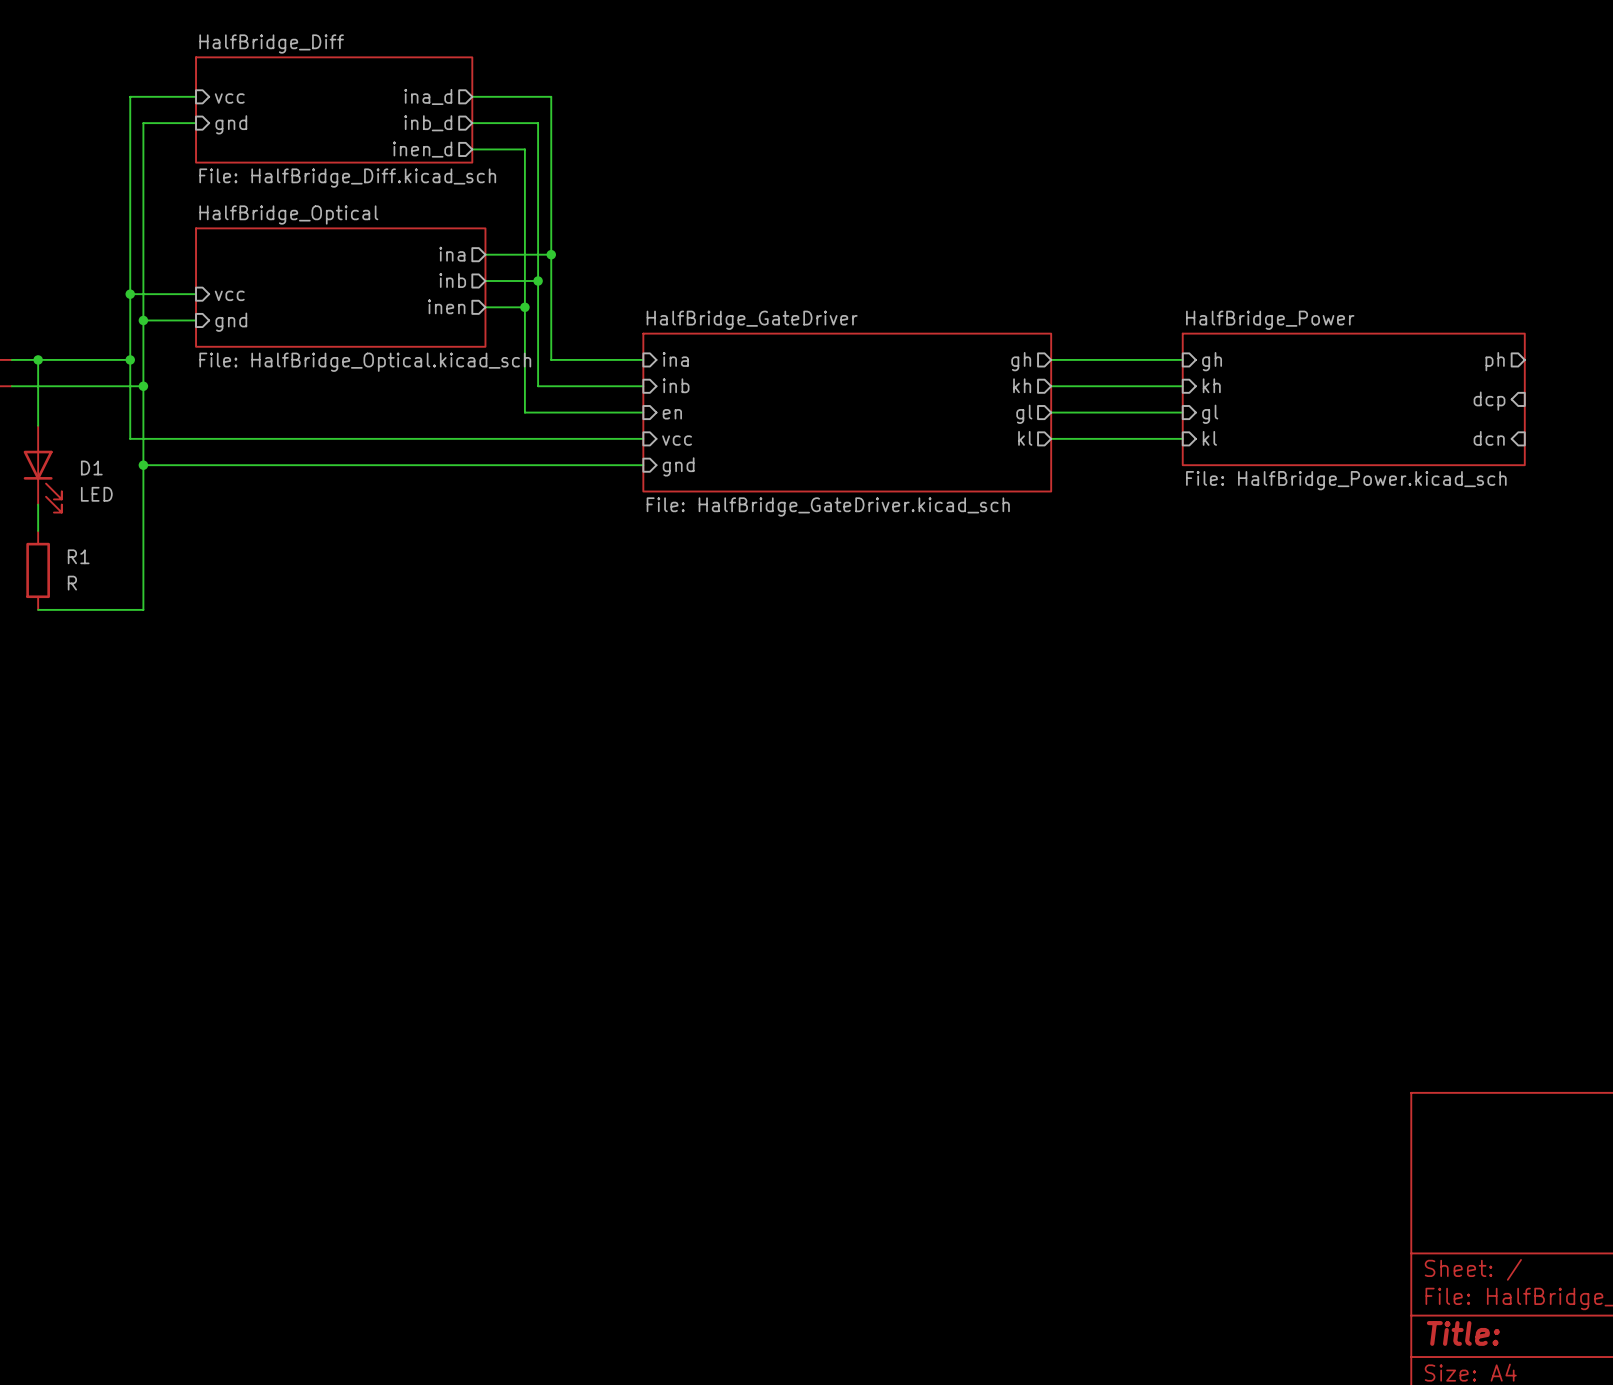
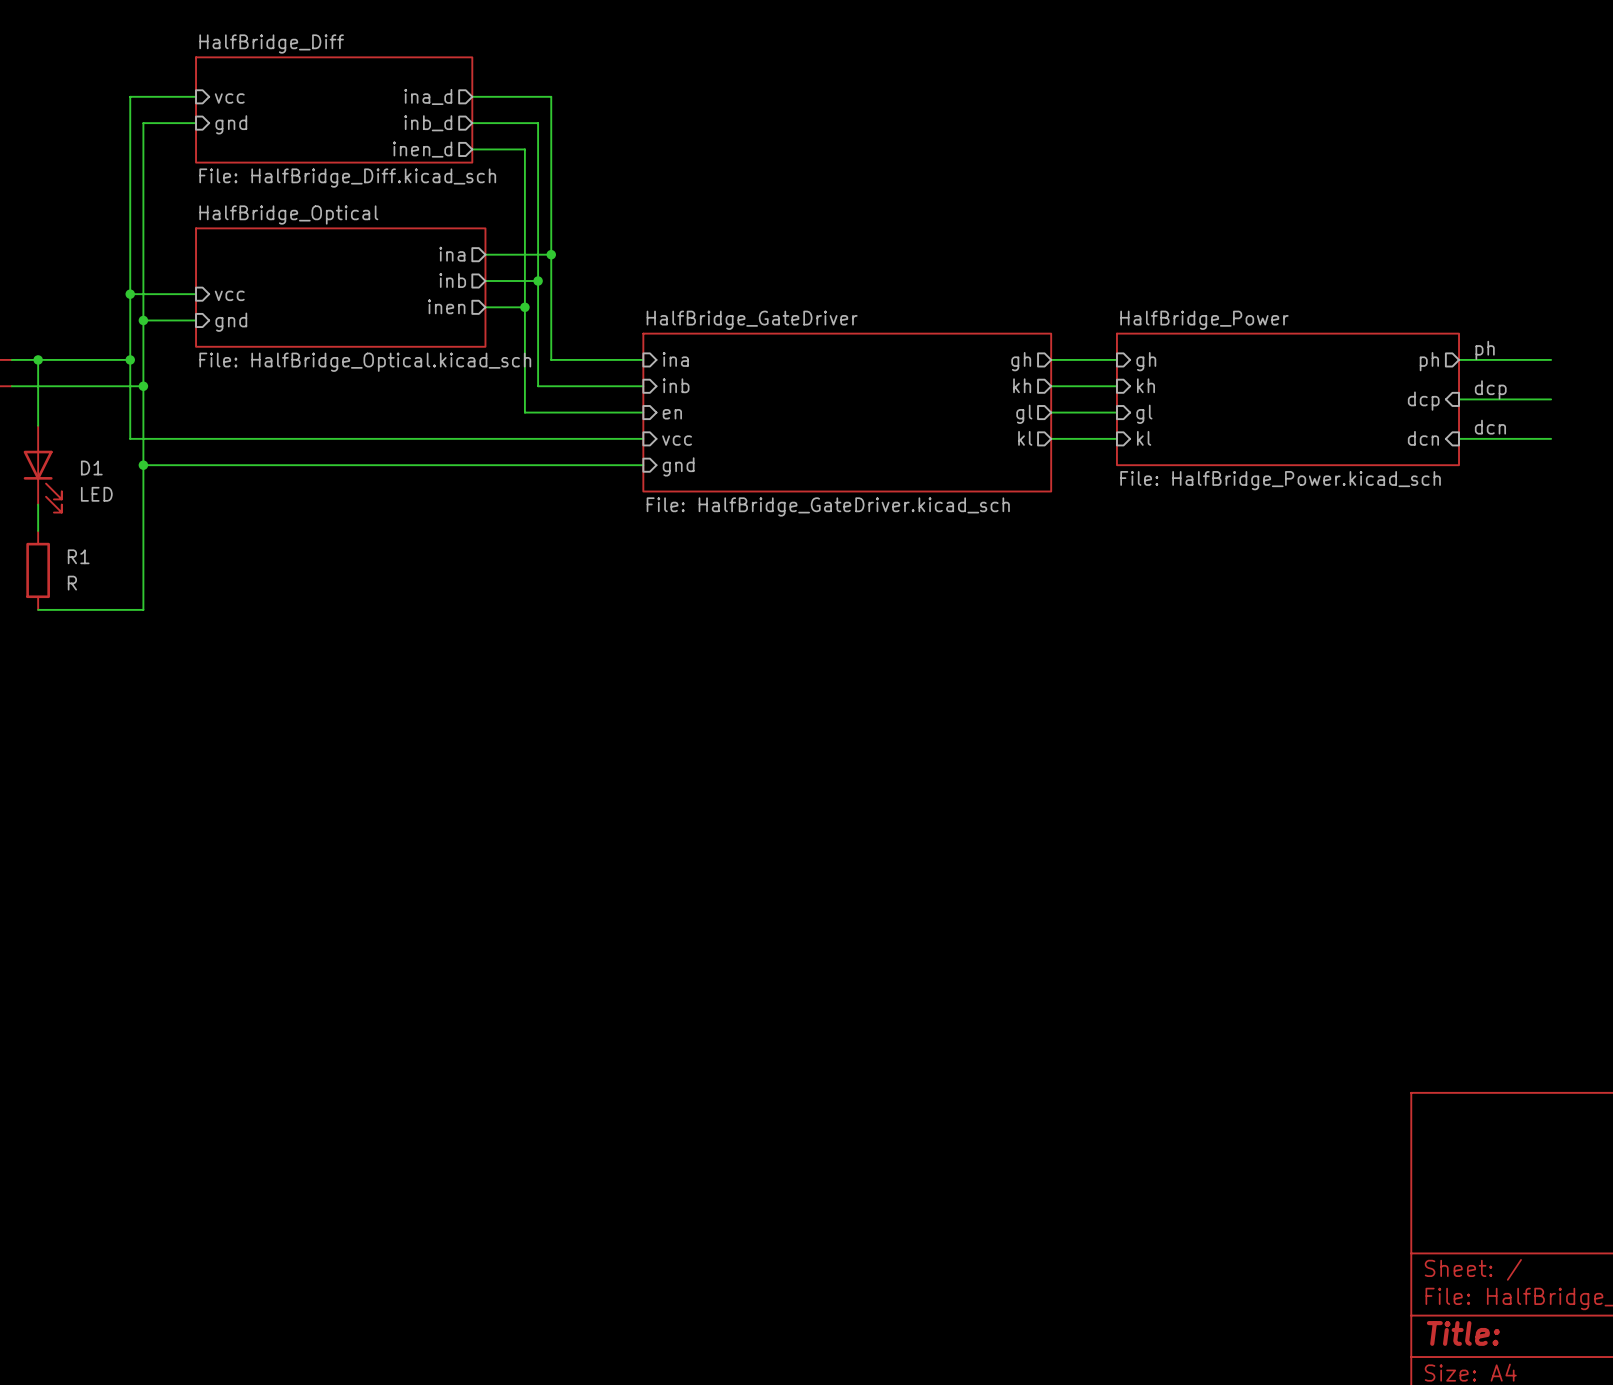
label: none -> ph (1485, 350)
wire: (1116, 359) (1182, 359) -> none
wire: none -> (1459, 359) (1551, 359)
sheet pin position: gh (1212, 361) -> gh (1146, 361)
sheet pin position: ph (1495, 361) -> ph (1429, 361)
sheet pin position: kh (1211, 385) -> kh (1145, 385)
wire: (1116, 386) (1182, 386) -> none
label: none -> dcp (1490, 389)
sheet HalfBridge_Power position: (1353, 399) -> (1287, 399)
wire: none -> (1459, 399) (1551, 399)
sheet pin position: dcp (1489, 401) -> dcp (1423, 401)
wire: (1116, 412) (1182, 412) -> none
sheet pin position: gl (1210, 414) -> gl (1144, 414)
label: none -> dcn (1490, 427)
wire: (1116, 438) (1182, 438) -> none
sheet pin position: kl (1209, 438) -> kl (1144, 438)
wire: none -> (1459, 438) (1551, 438)
sheet pin position: dcn (1489, 438) -> dcn (1423, 438)

